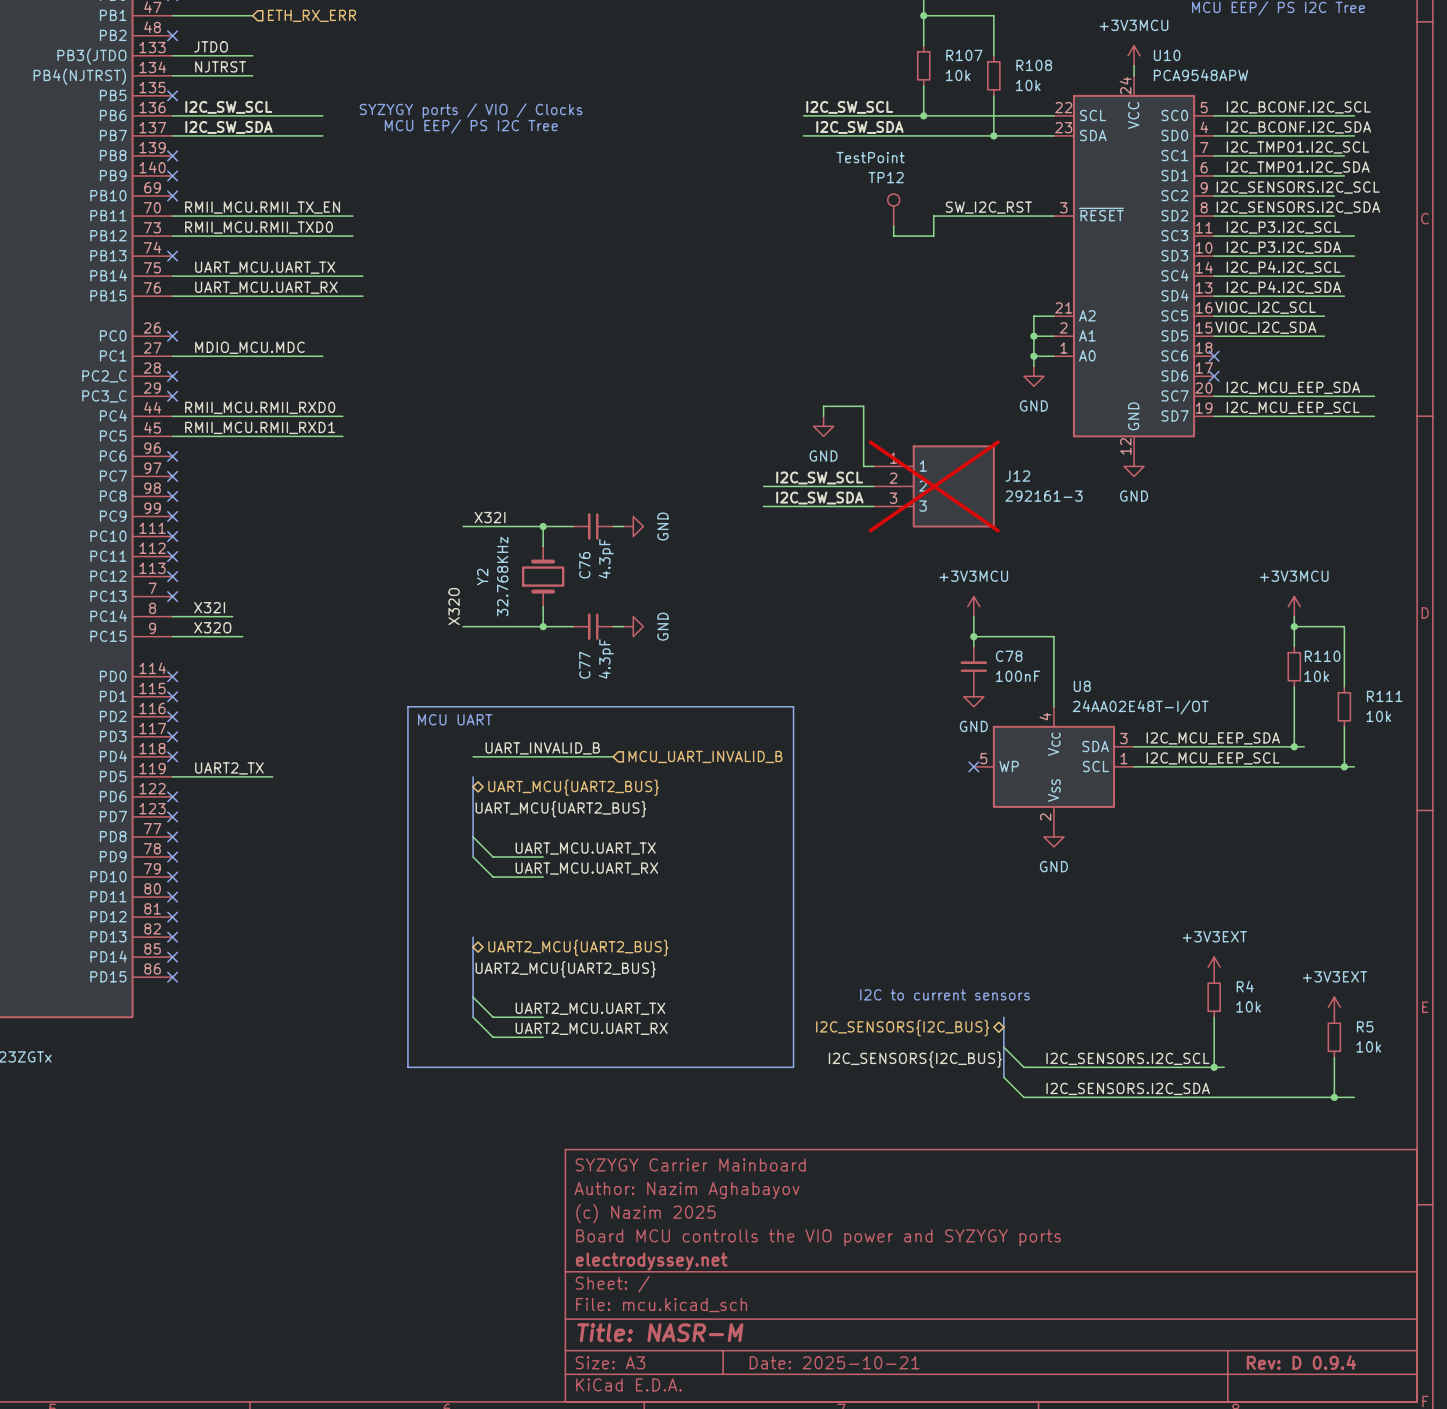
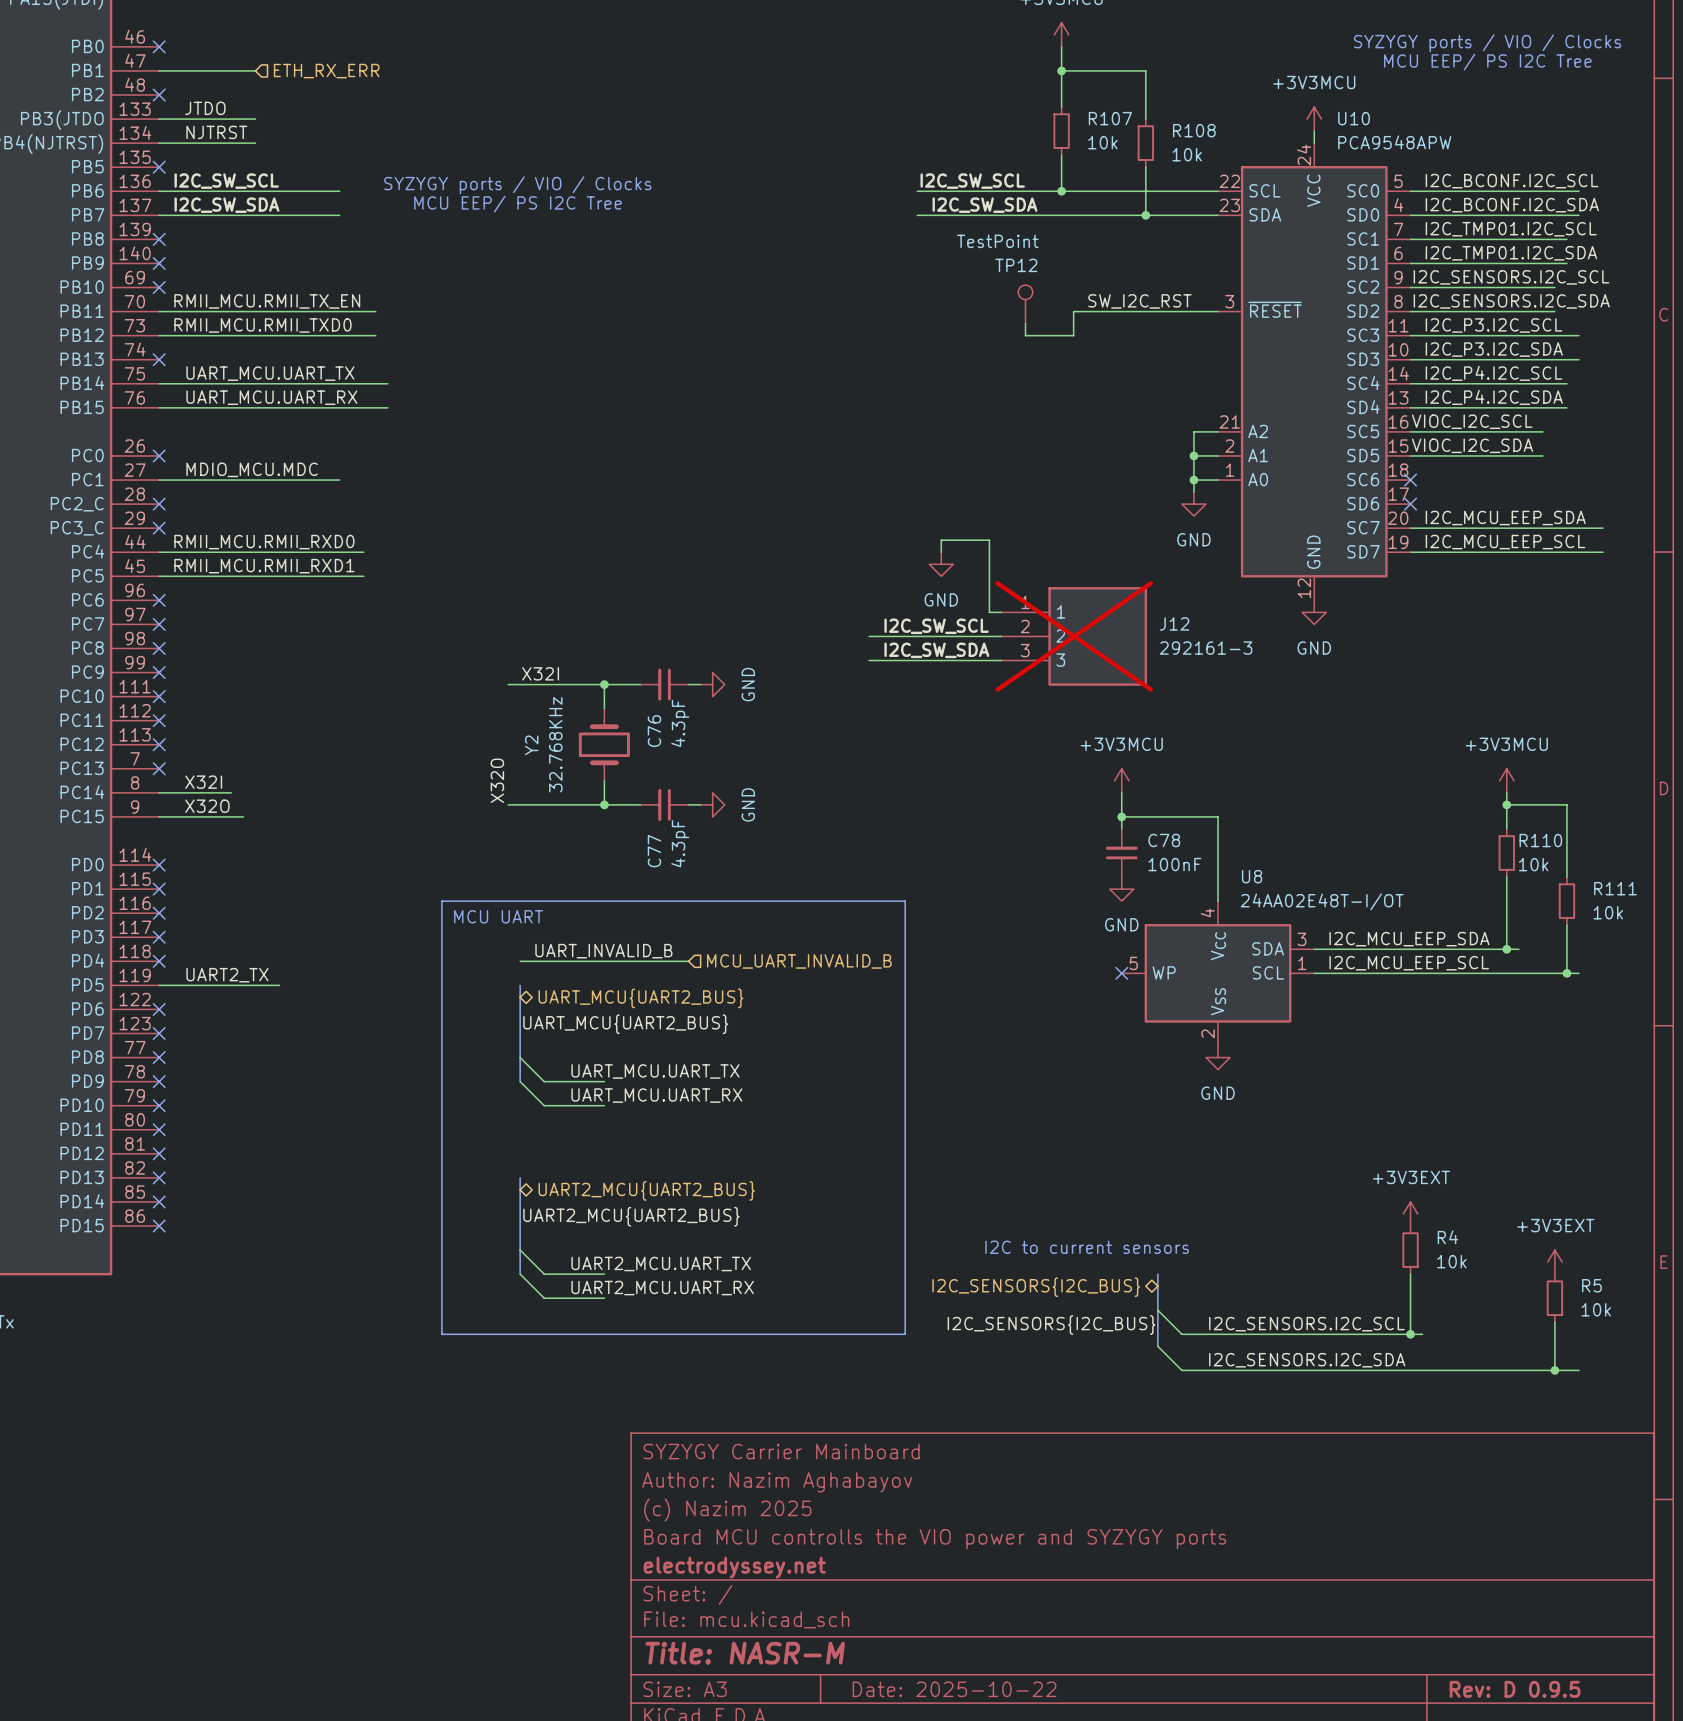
title block: Date: 2025-10-21 (834, 1362) -> Date: 2025-10-22 (954, 1689)
title block: Rev: D 0.9.4 (1301, 1362) -> Rev: D 0.9.5 (1515, 1689)

